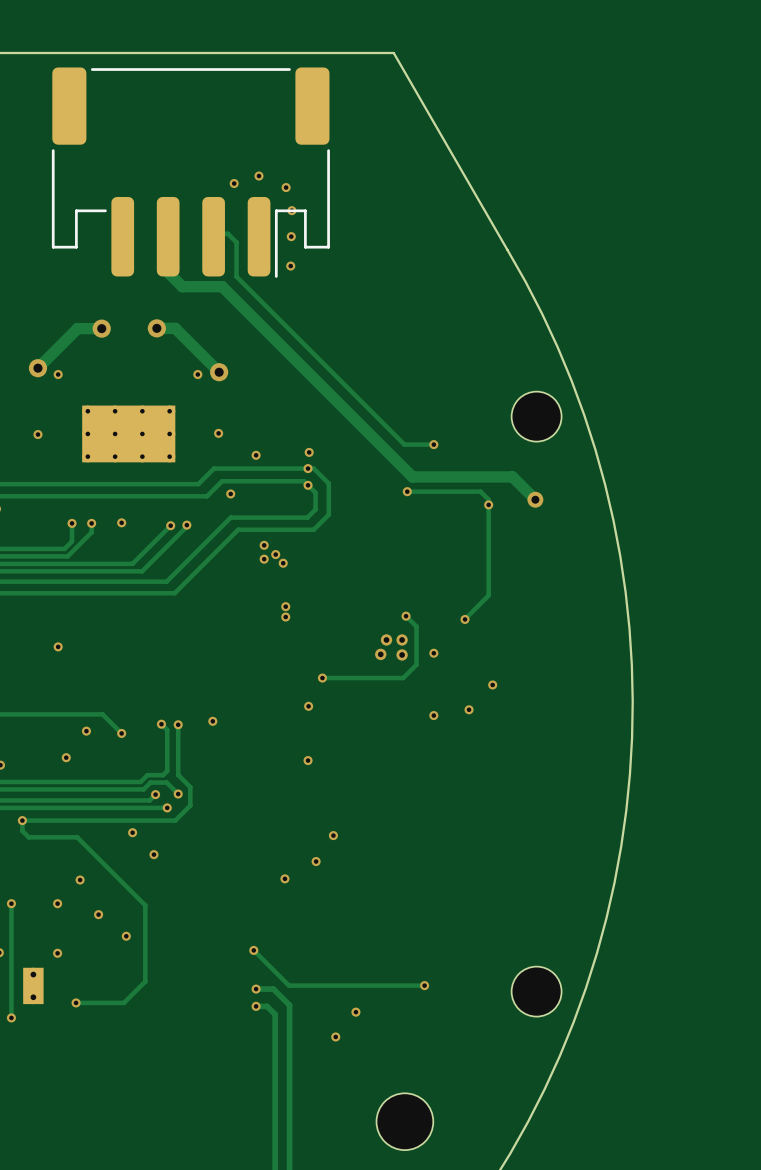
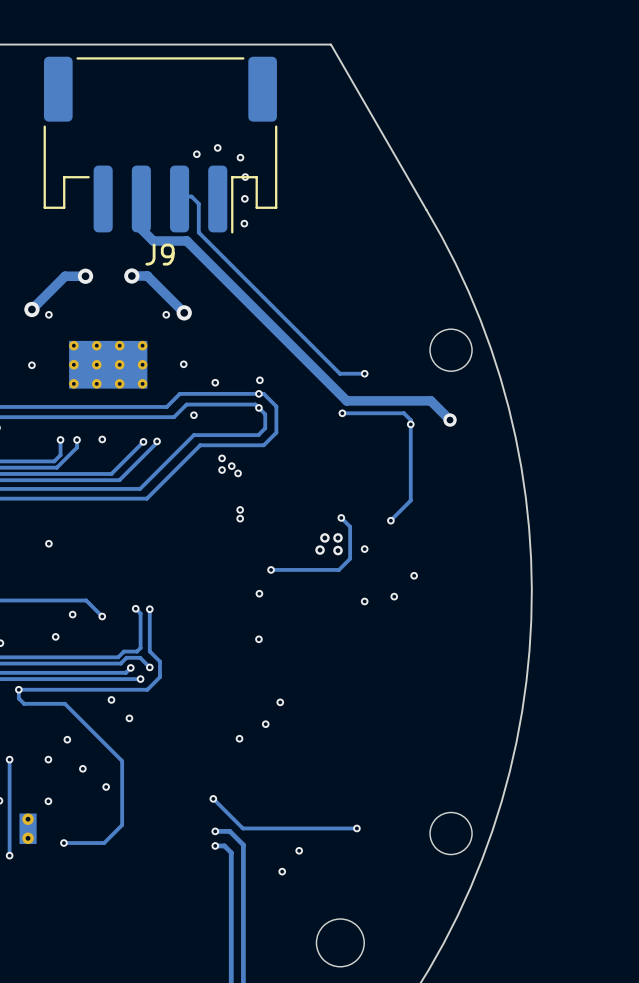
J9 name: none -> J9 (160, 254)
via: (212, 721) -> none

